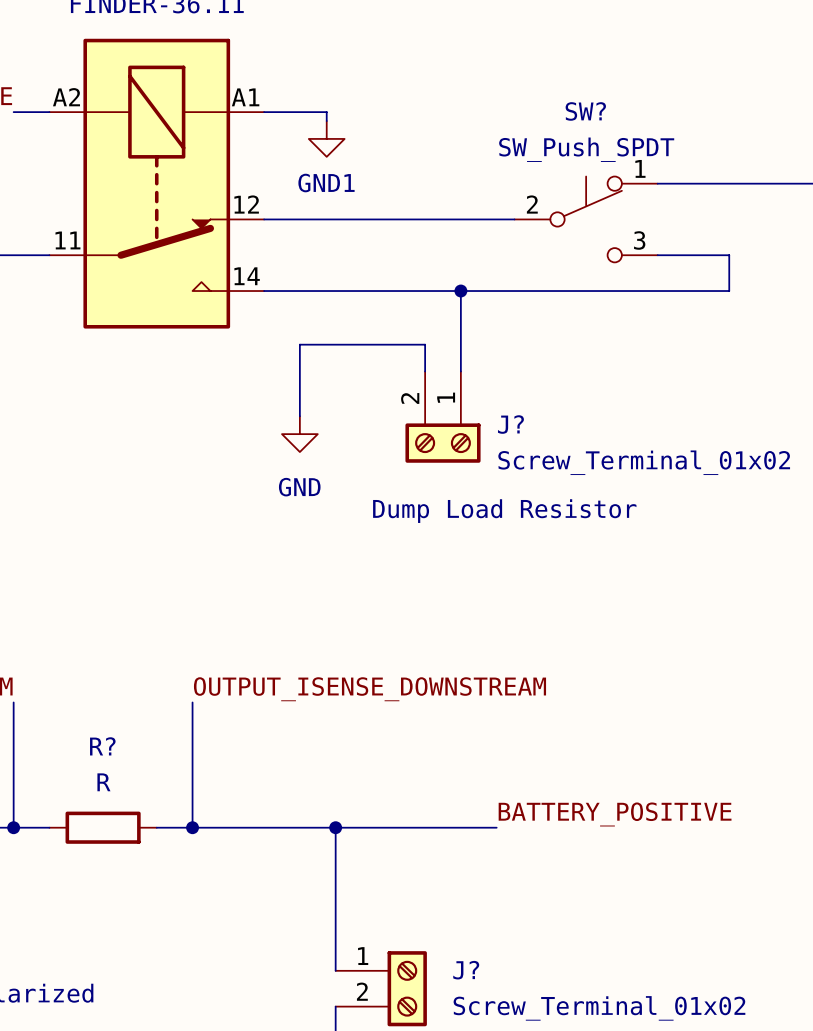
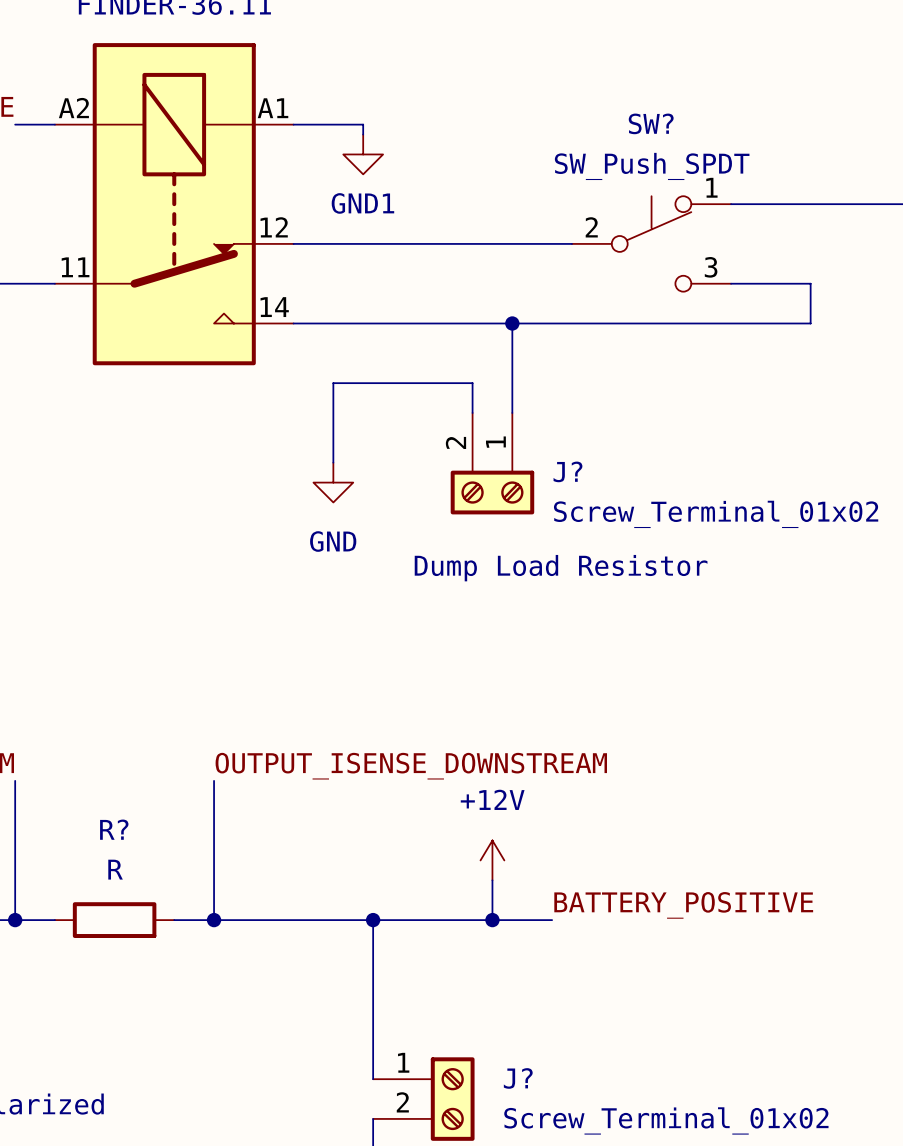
power symbol: none -> +12V (492, 860)
wire: none -> (492, 880) (492, 920)
junction: none -> (492, 920)

